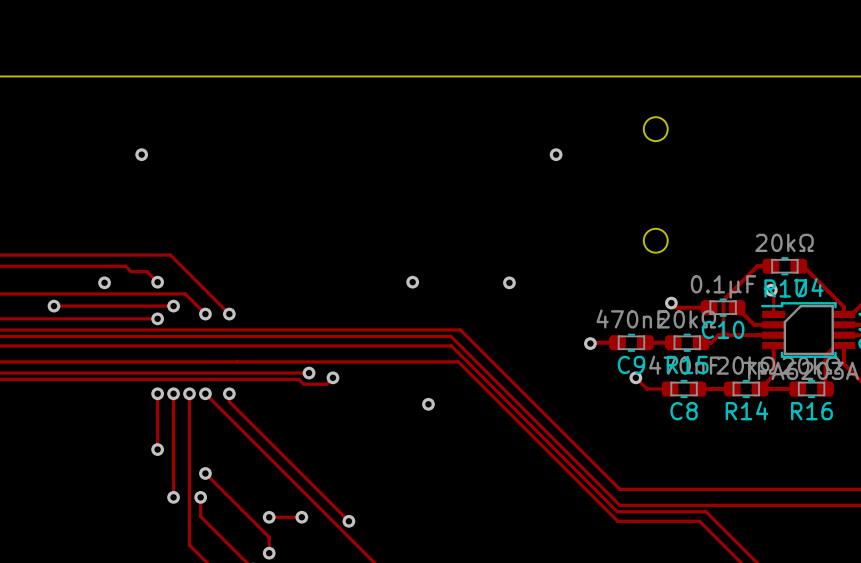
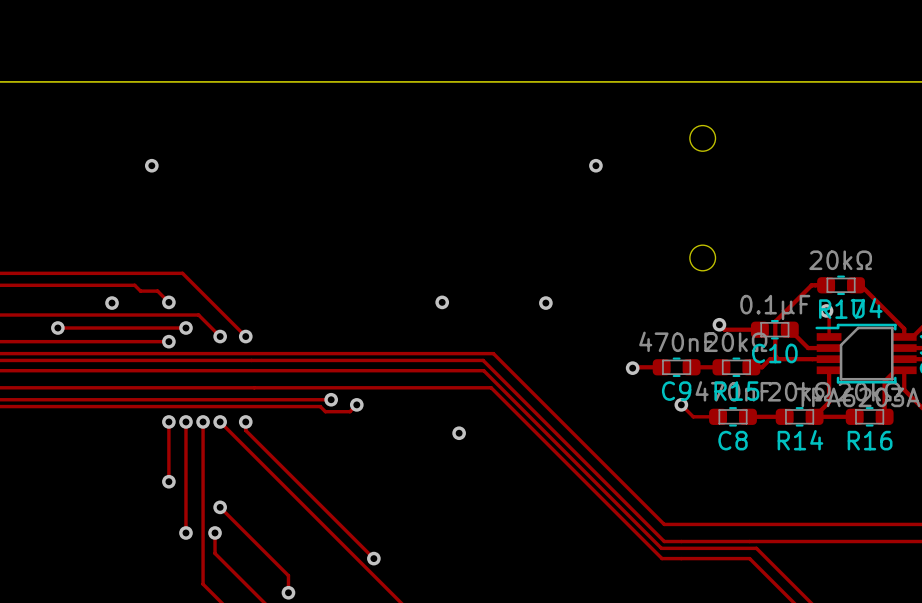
track: (269, 517) (301, 517) -> none
via: (269, 517) -> none
via: (301, 517) -> none

